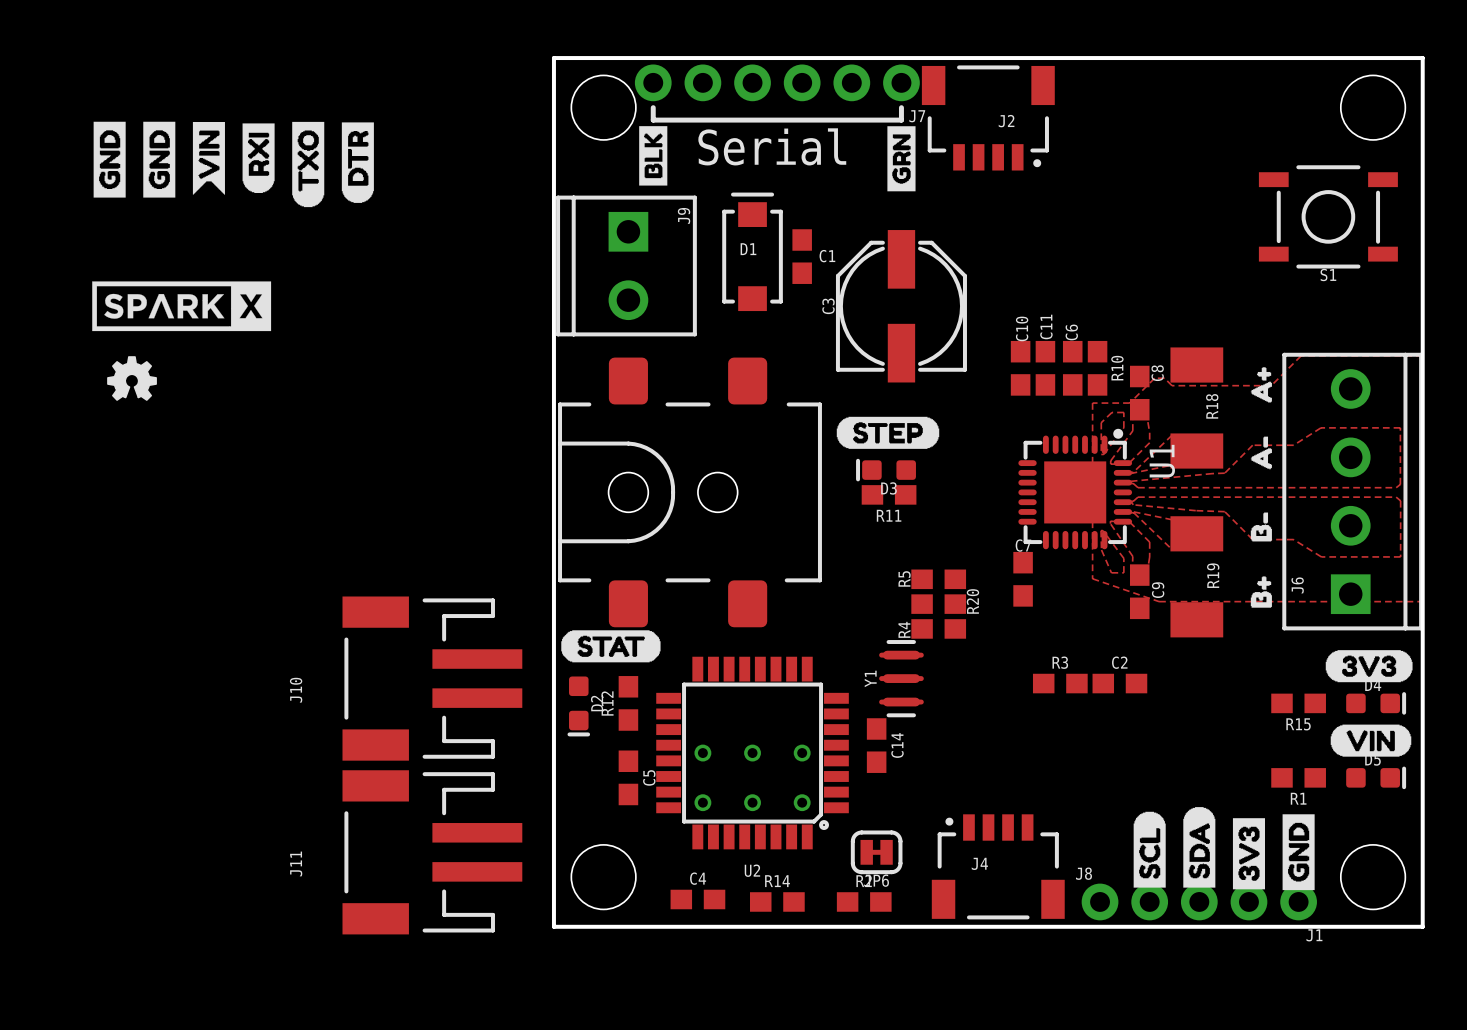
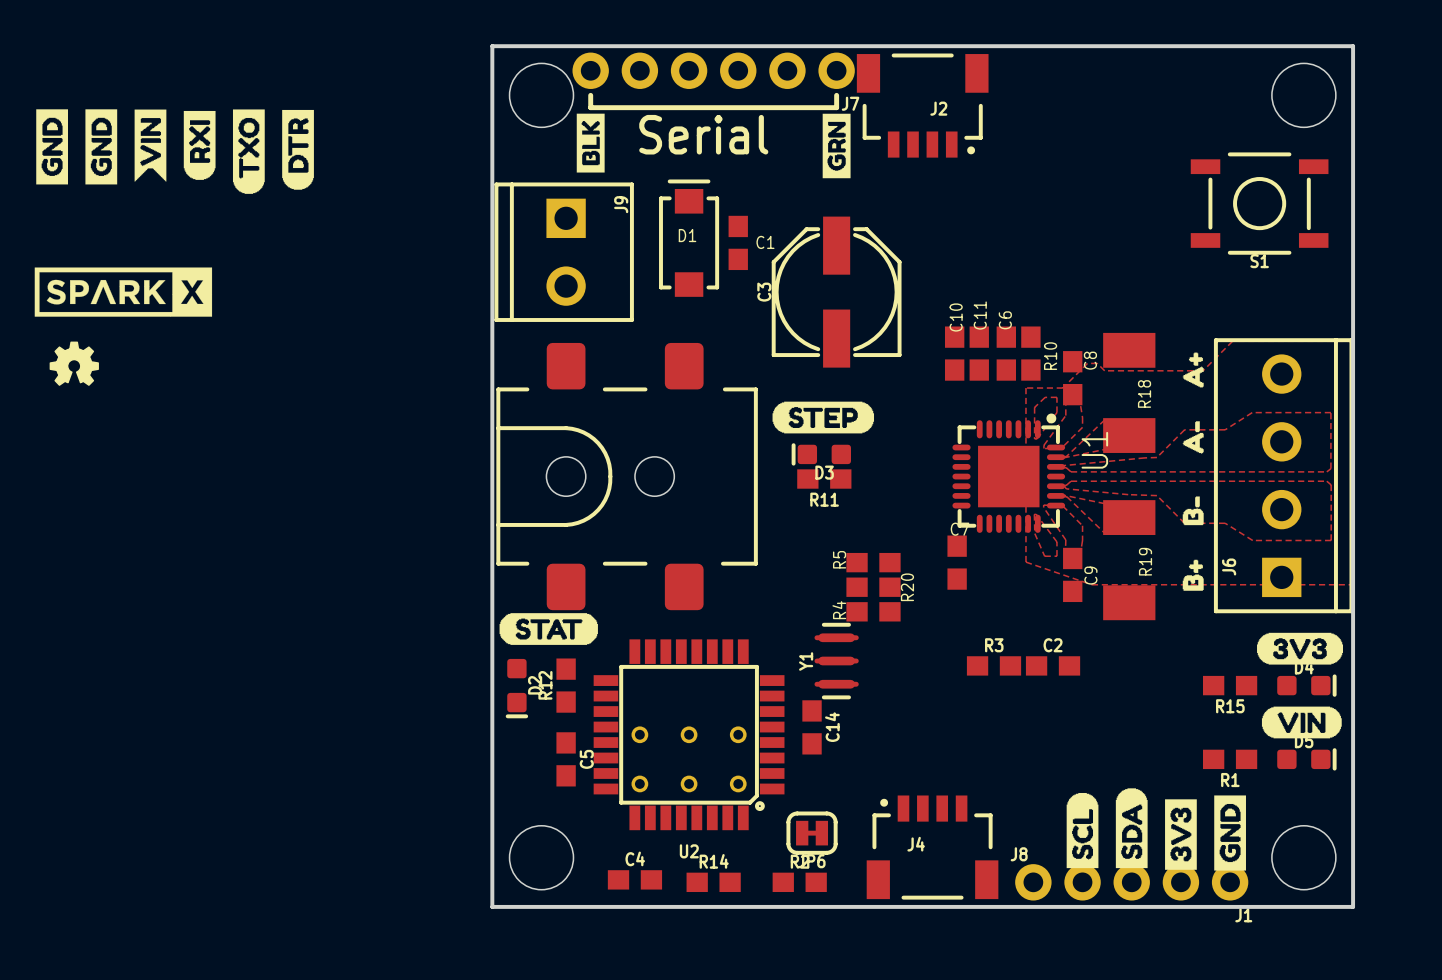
J10: (432, 678) -> none
J11: (432, 852) -> none

